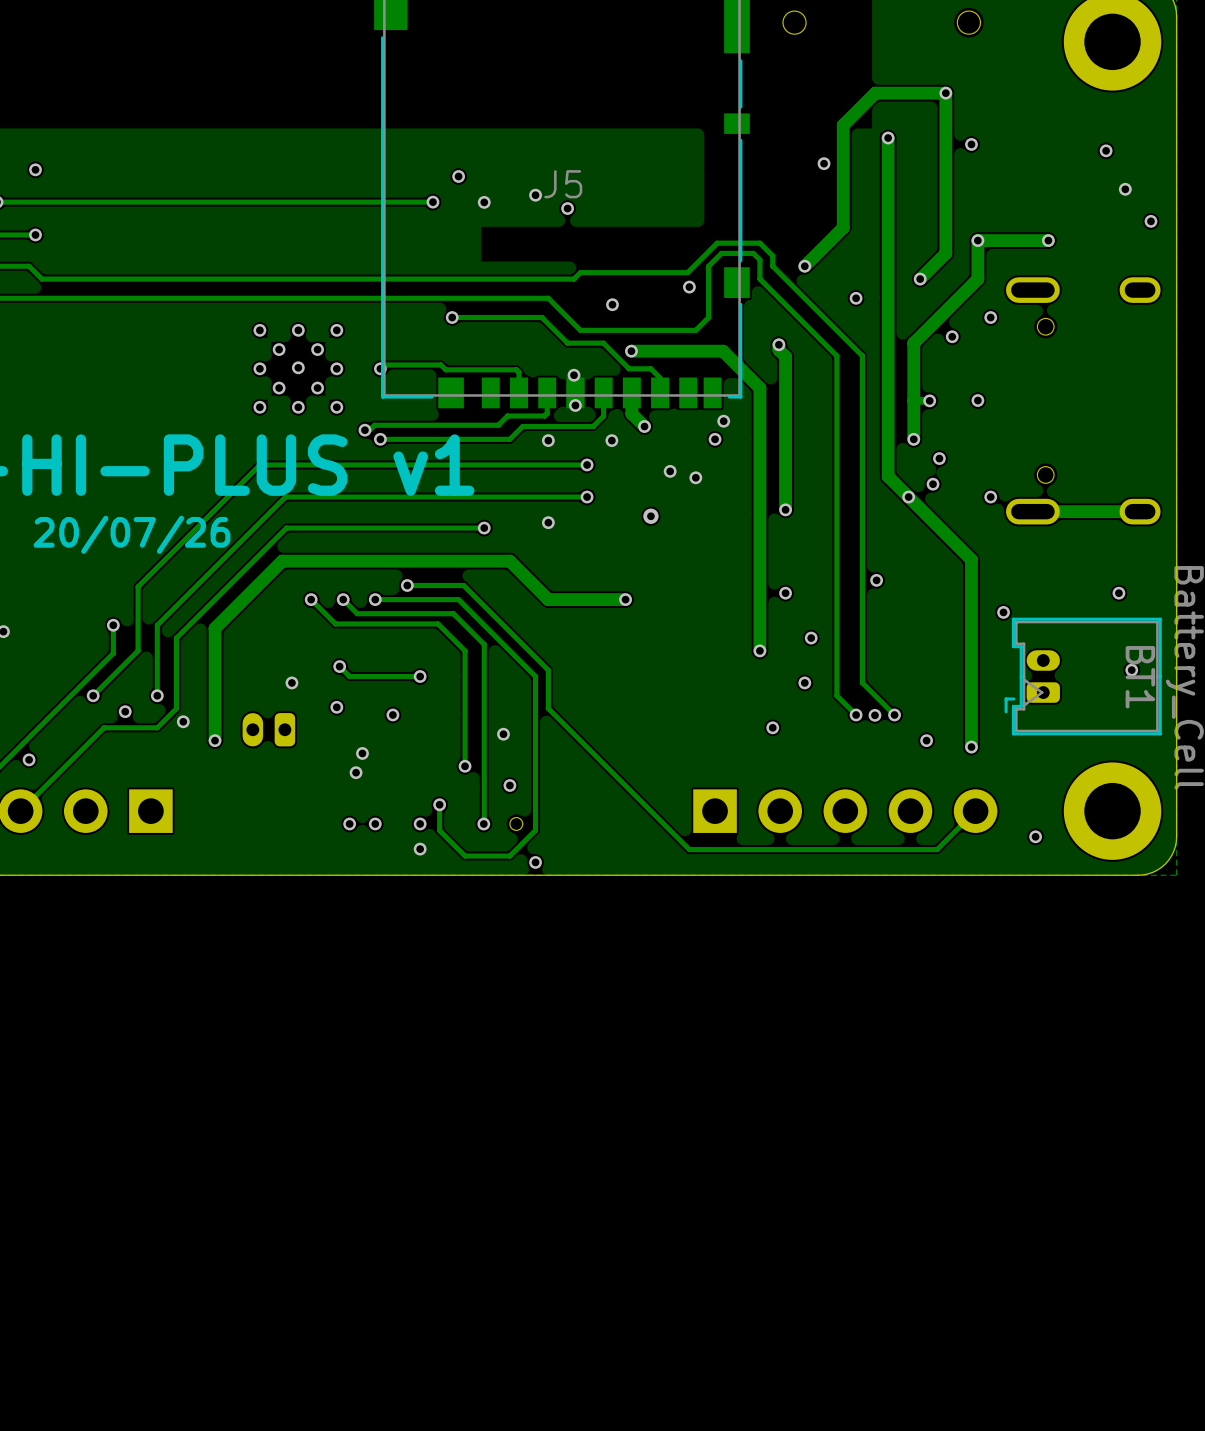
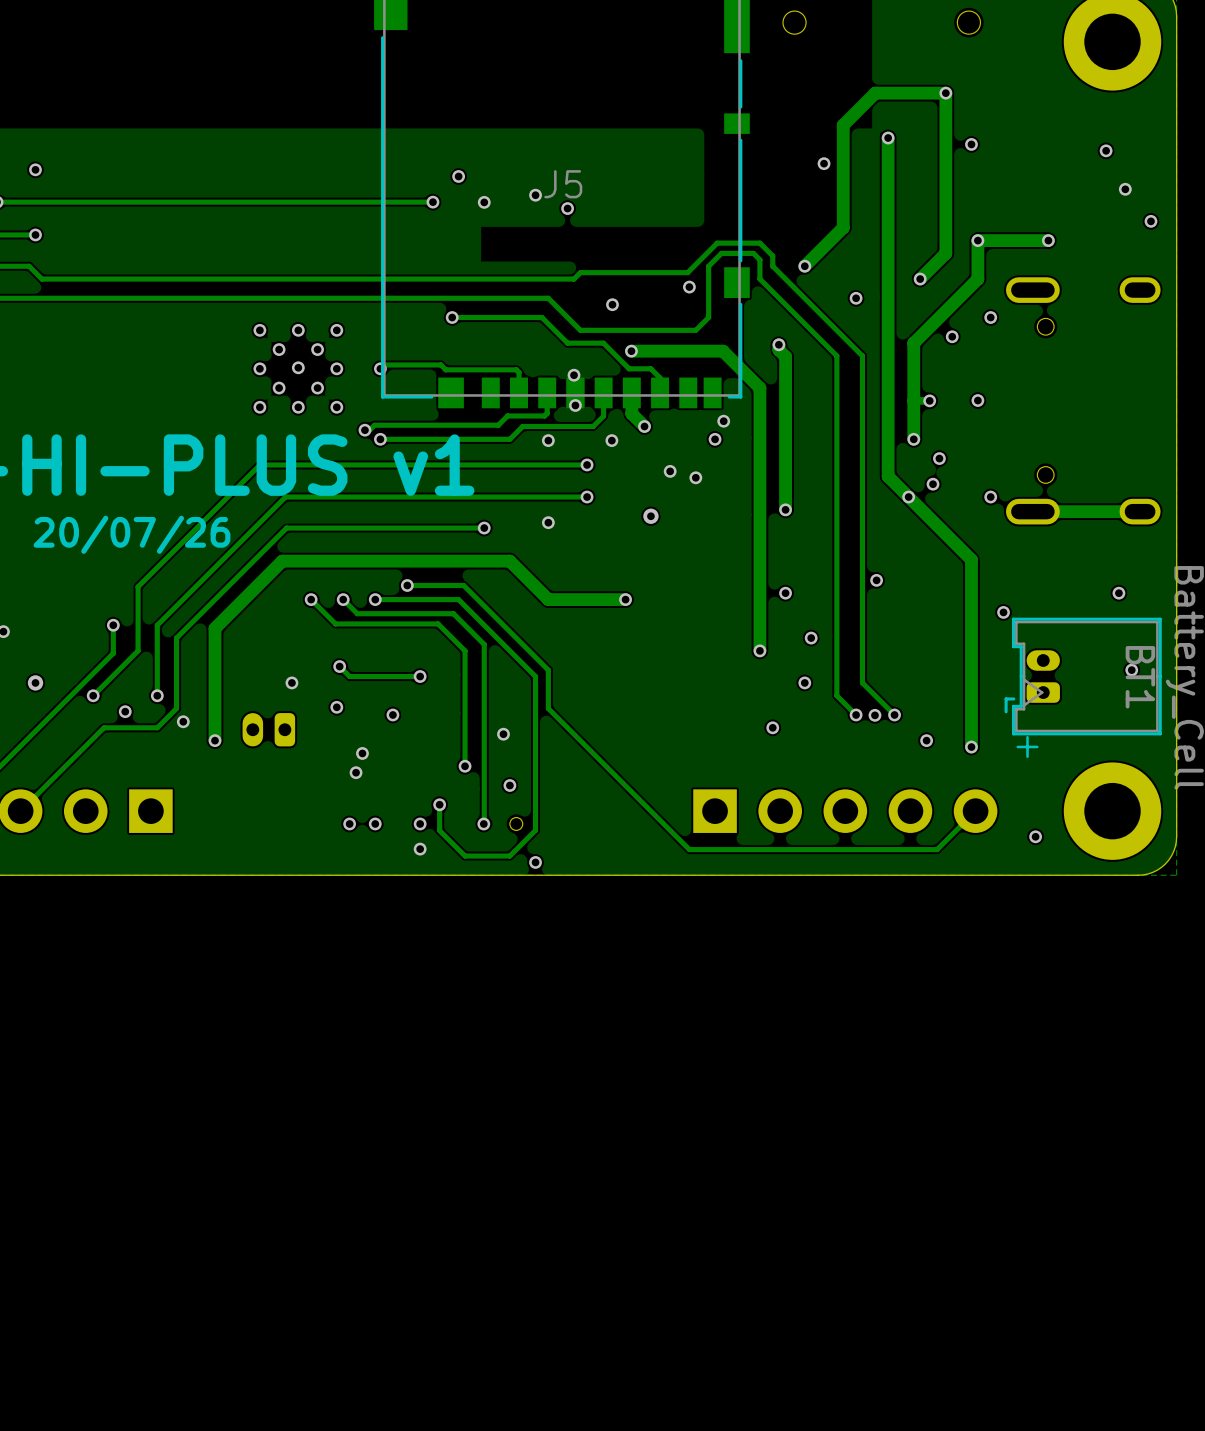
via: none -> (35, 682)
text: none -> + (1027, 746)
via: (29, 759) -> none

